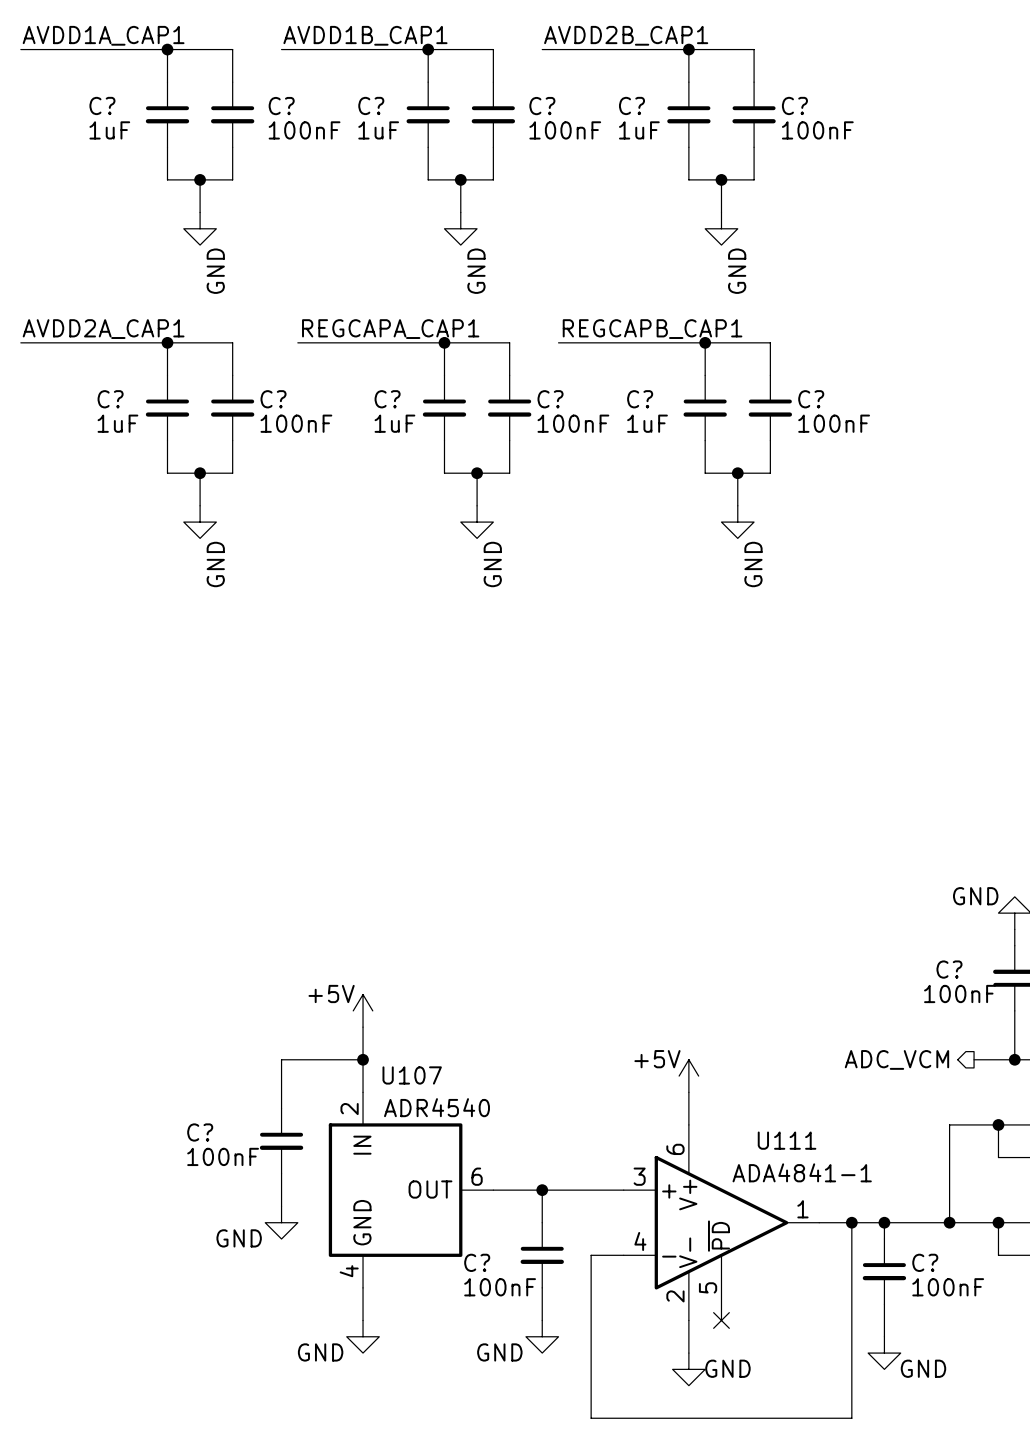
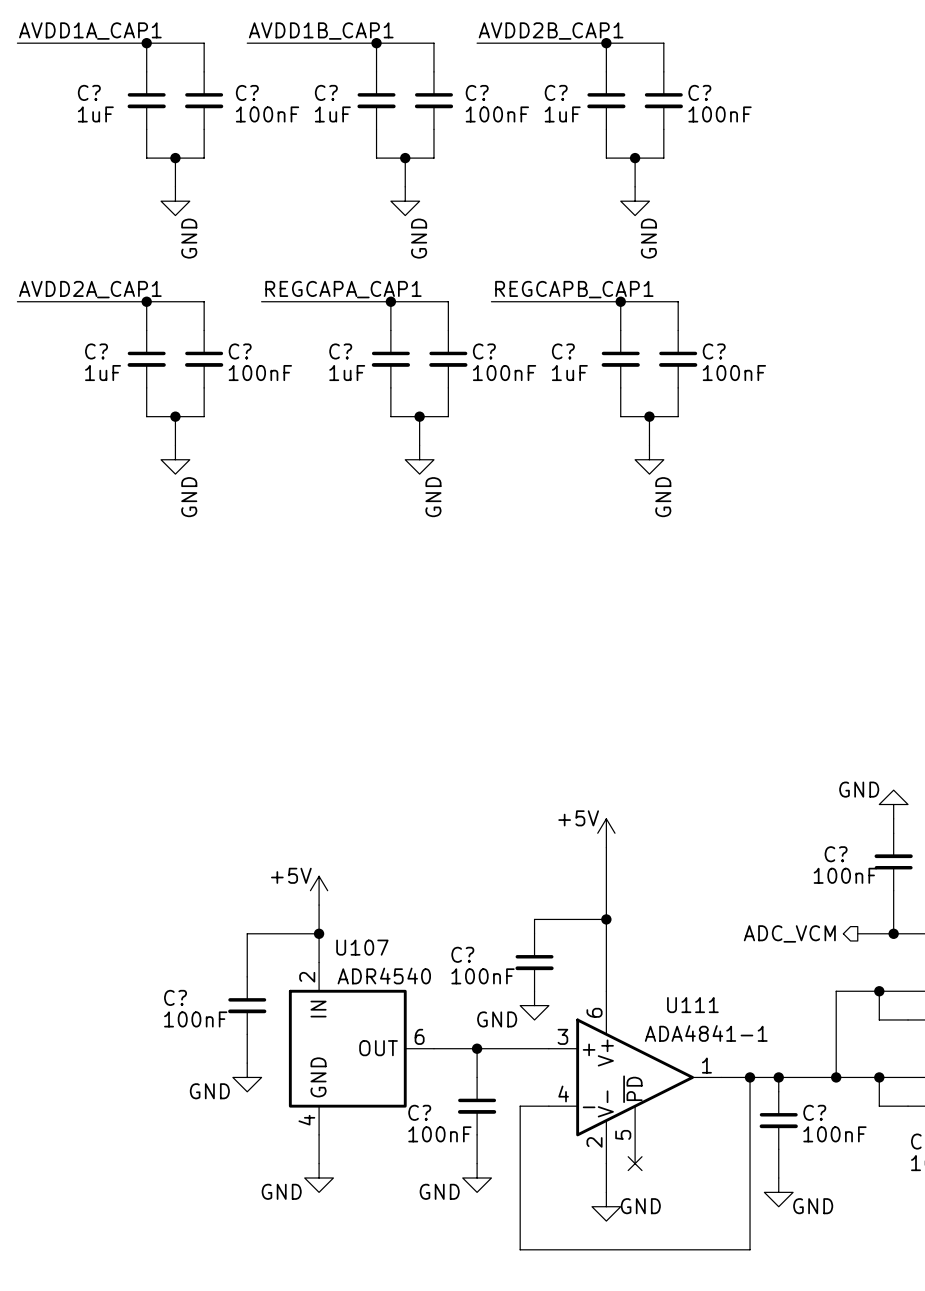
wire: none -> (606, 847) (606, 962)
wire: none -> (606, 919) (534, 919) (534, 933)
junction: none -> (606, 919)
power symbol position: +5V (688, 1076) -> +5V (606, 833)
C?: none -> 100nF (534, 962)
power symbol: none -> GND (534, 1005)

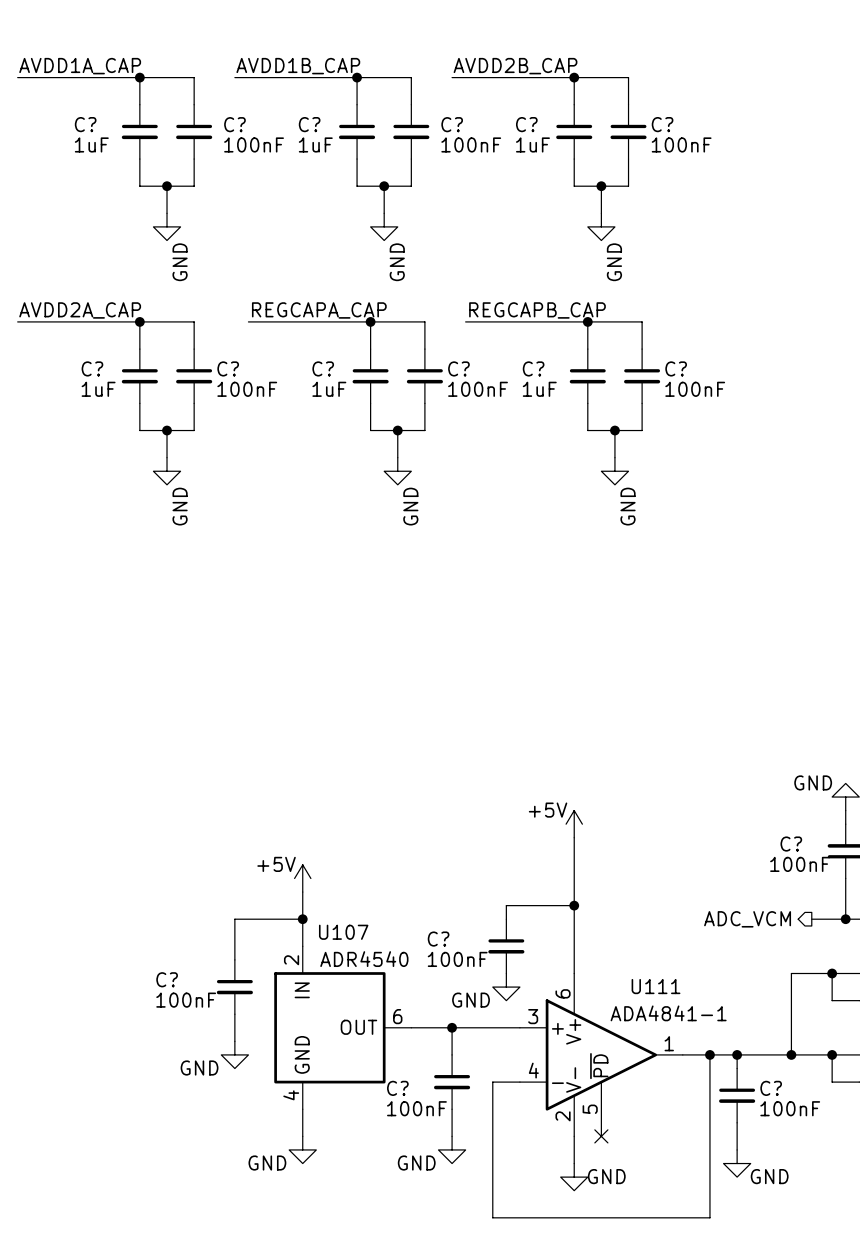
label: AVDD1A_CAP1 (90, 31) -> AVDD1A_CAP (80, 66)
label: AVDD1B_CAP1 (321, 31) -> AVDD1B_CAP (298, 66)
label: AVDD2B_CAP1 (551, 31) -> AVDD2B_CAP (515, 66)
label: AVDD2A_CAP1 (90, 289) -> AVDD2A_CAP (80, 310)
label: REGCAPA_CAP1 (343, 289) -> REGCAPA_CAP (319, 310)
label: REGCAPB_CAP1 (574, 289) -> REGCAPB_CAP (537, 310)

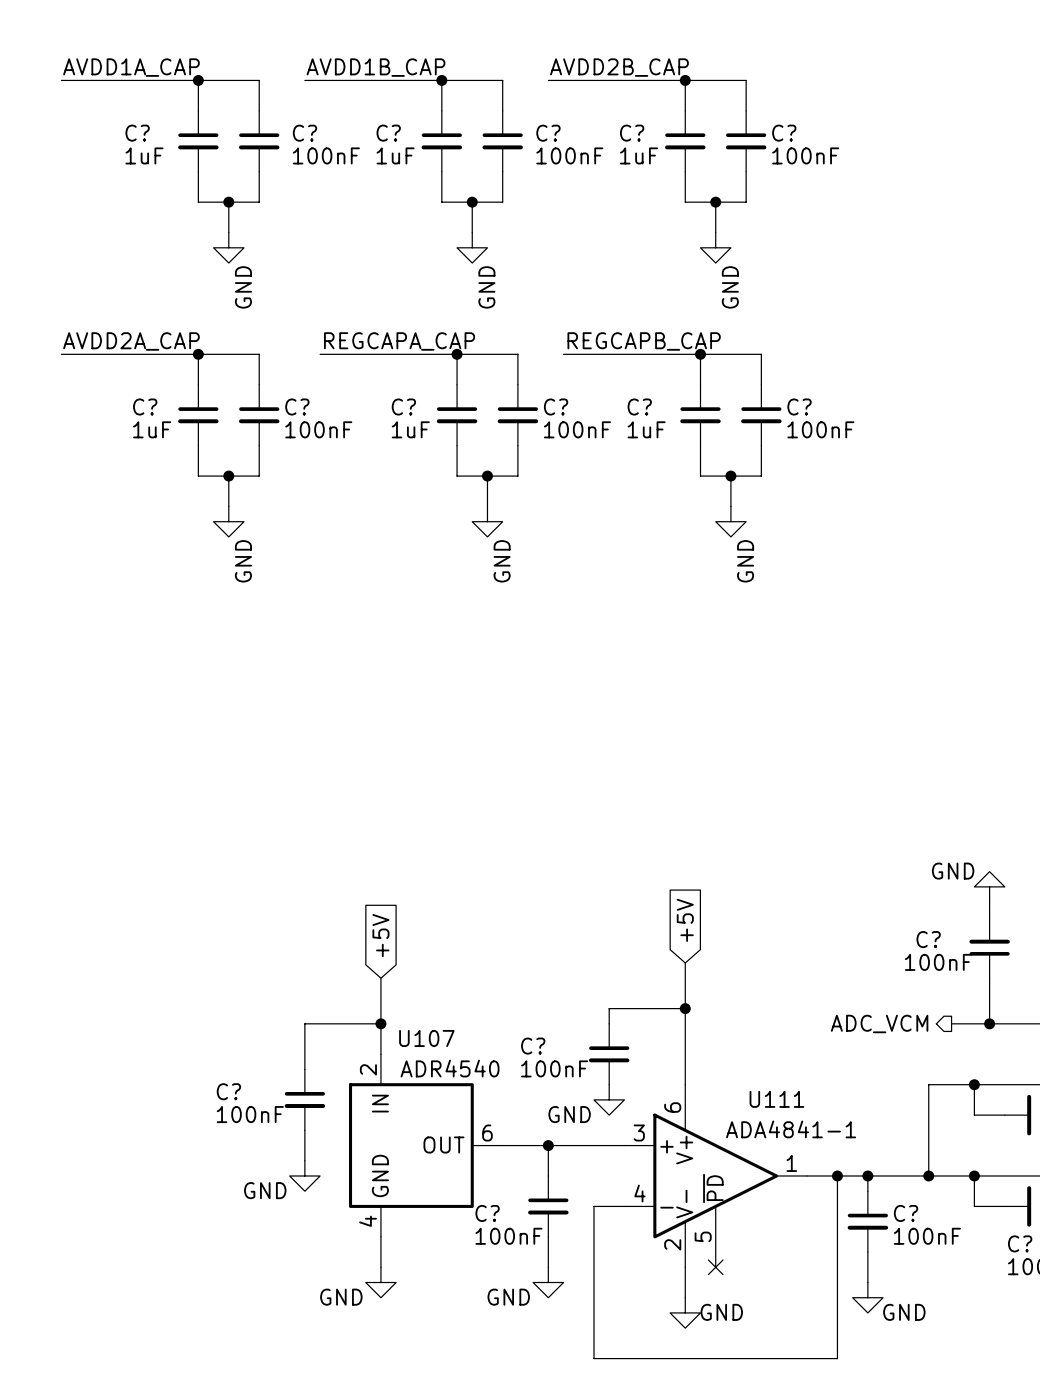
power symbol: +5V (574, 824) -> none
global label: none -> +5V (685, 920)
wire: (574, 837) (574, 864) -> none
global label: none -> +5V (380, 935)
power symbol: +5V (302, 878) -> none

